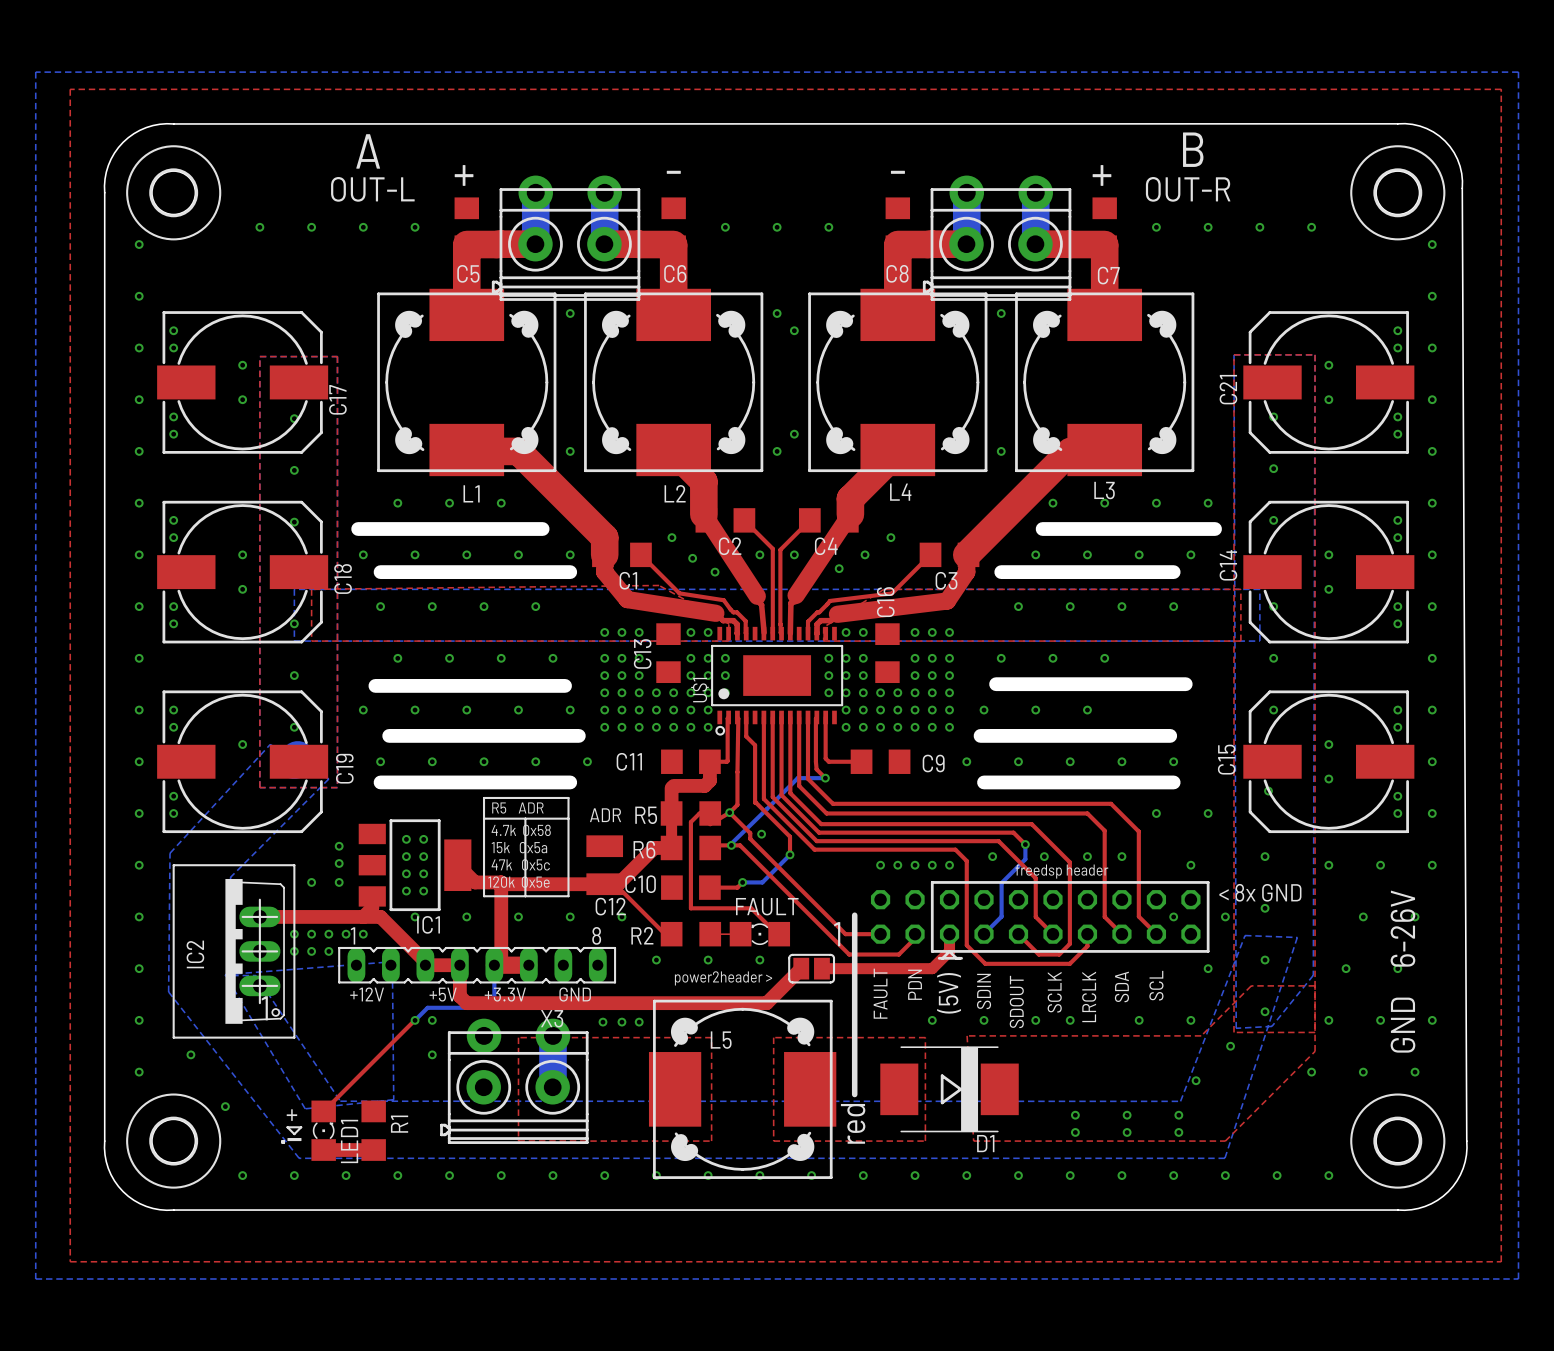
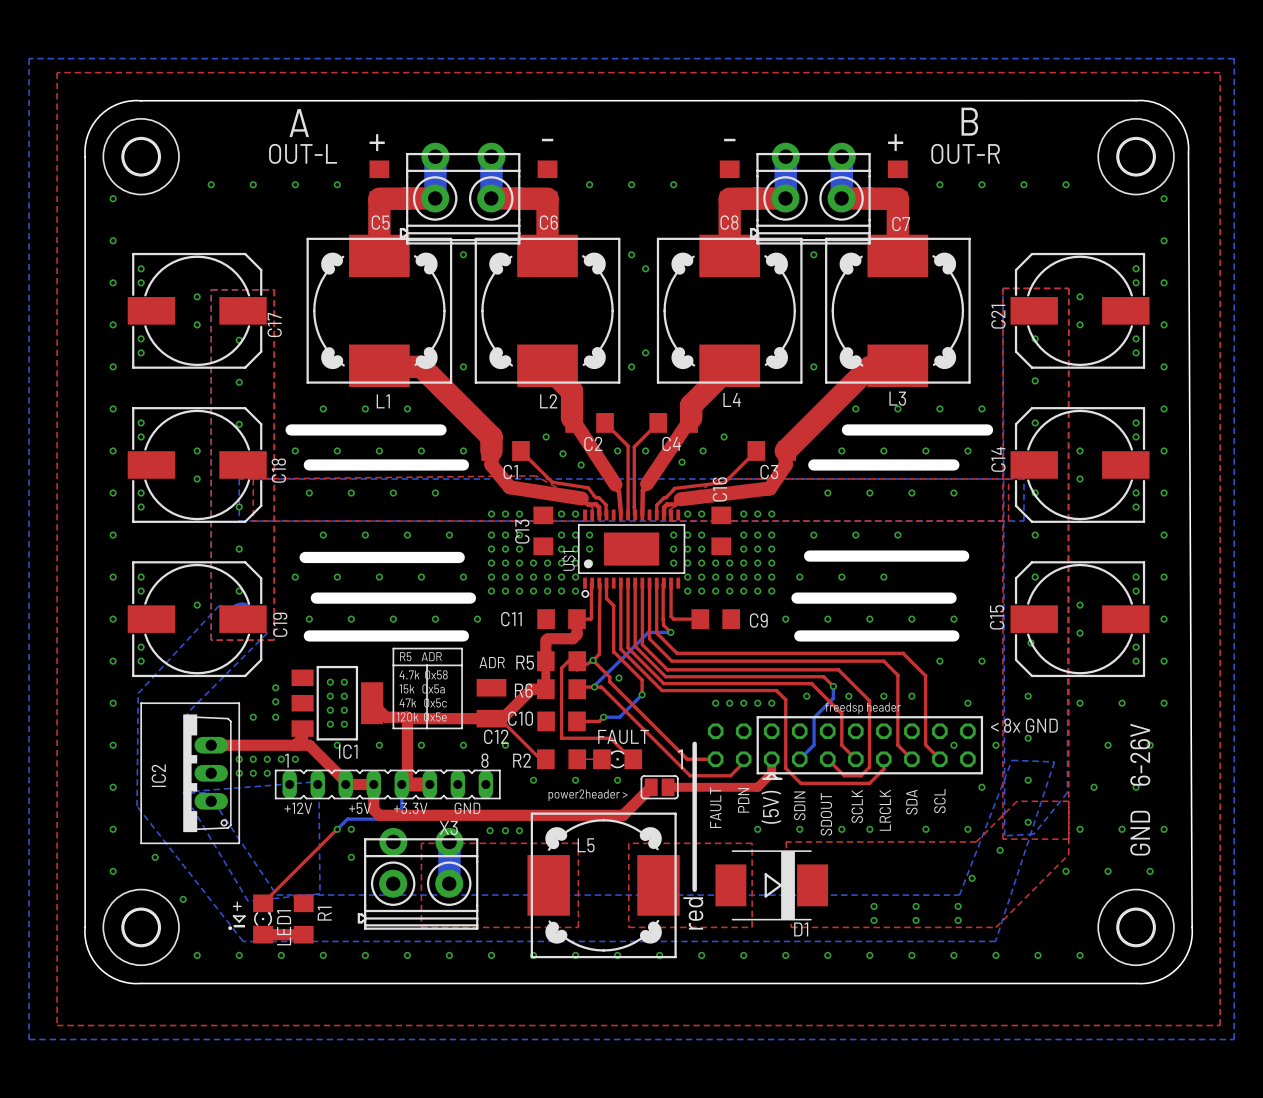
line: (259, 899) (259, 1003) -> none
line: (242, 916) (277, 916) -> none
line: (242, 951) (277, 951) -> none
line: (242, 985) (277, 985) -> none
text: 1 (264, 1008) -> none

